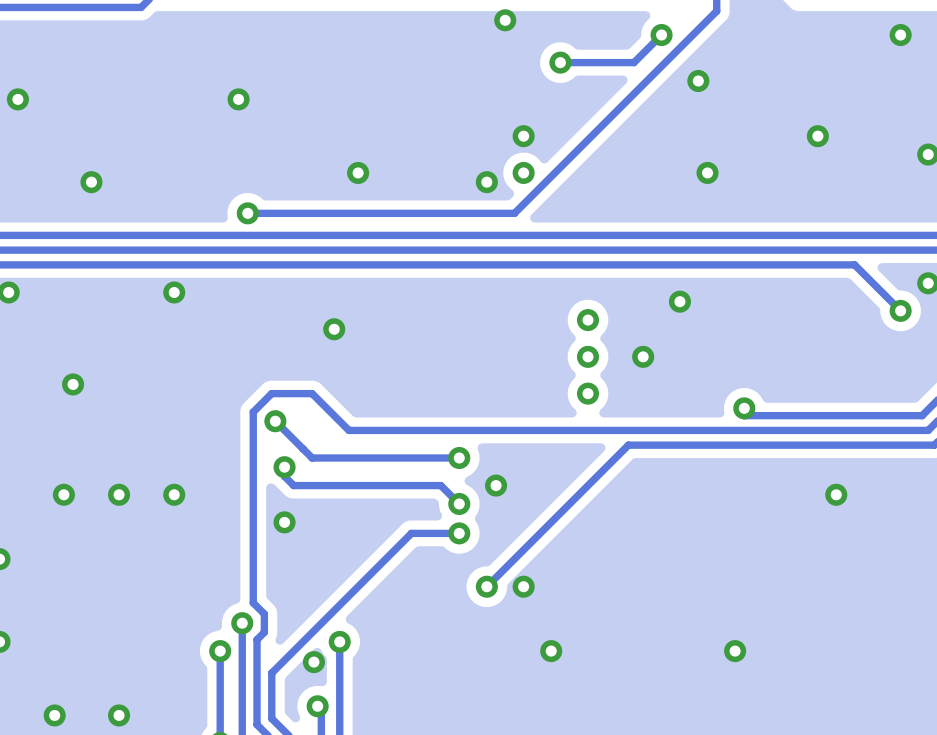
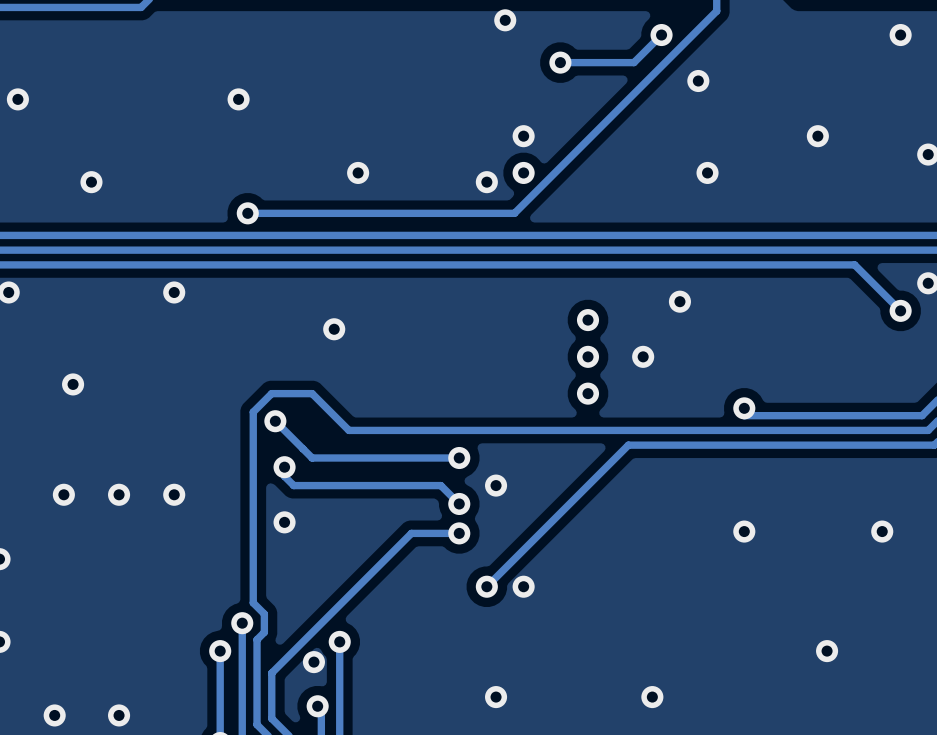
via: (836, 494) -> none
via: none -> (744, 531)
via: none -> (882, 531)
via: (551, 651) -> none
via: (735, 651) -> none
via: none -> (827, 651)
via: none -> (496, 697)
via: none -> (652, 697)

